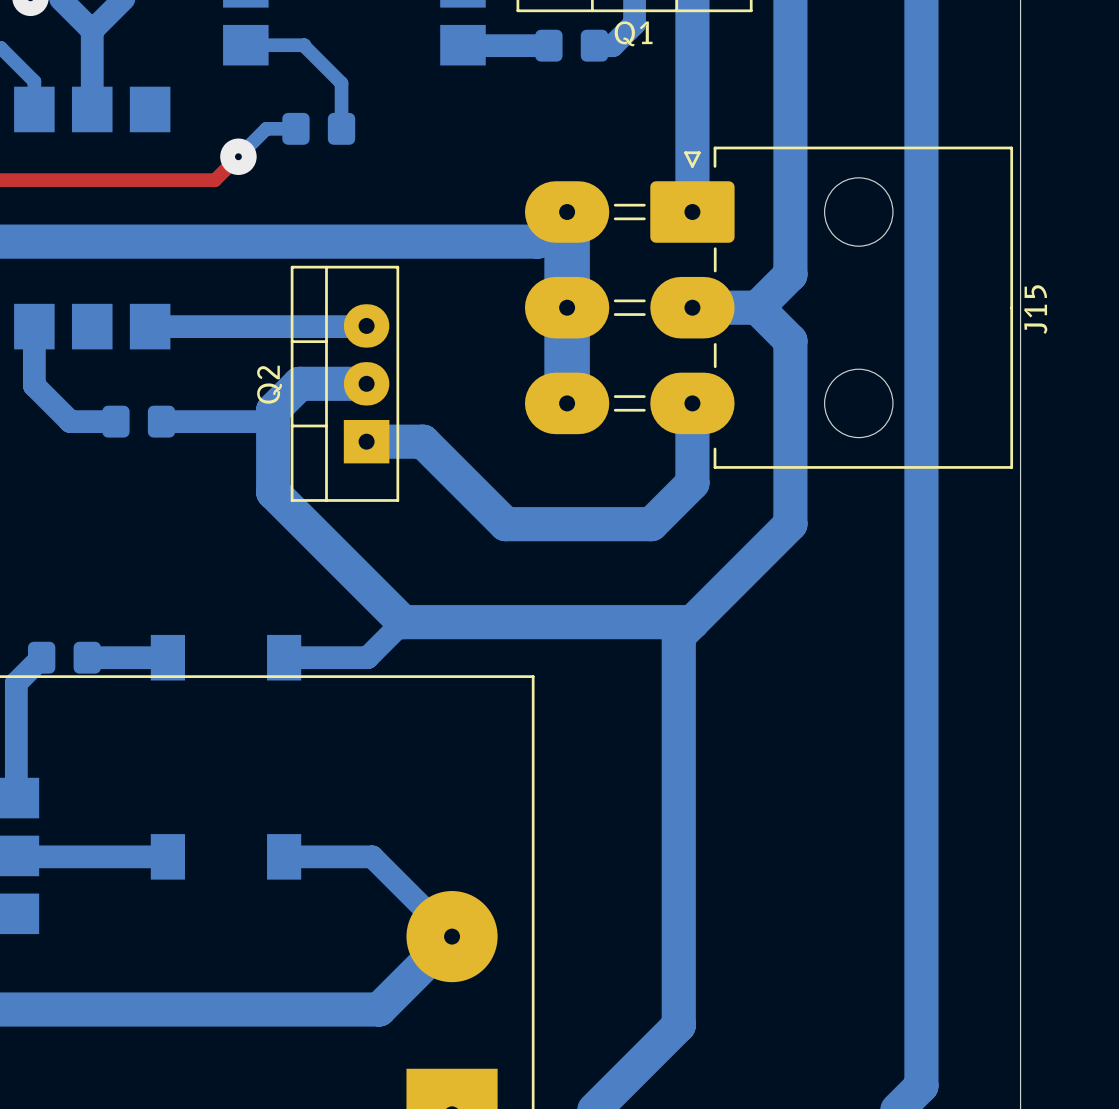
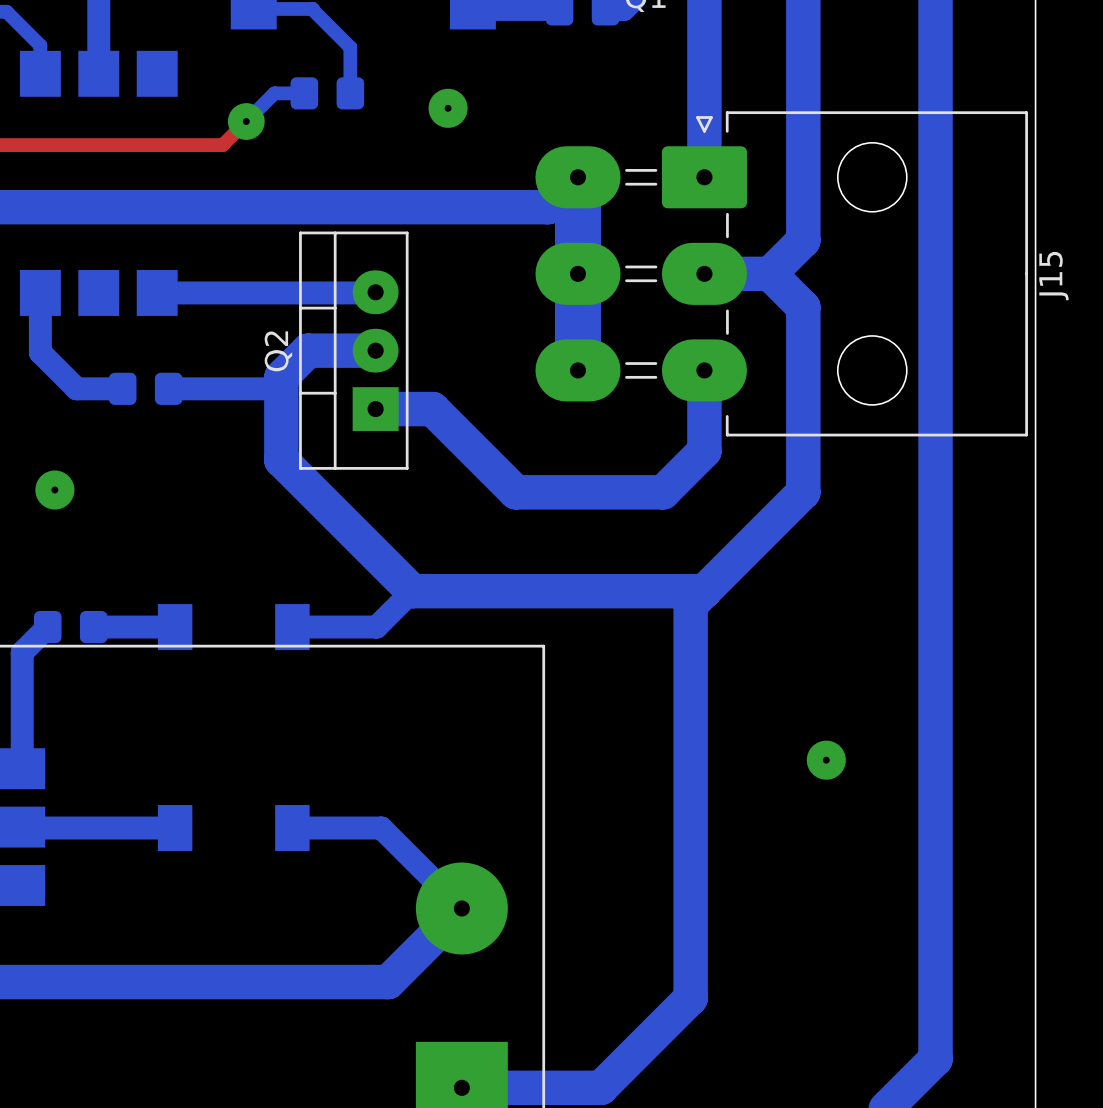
via: none -> (448, 108)
via: none -> (54, 490)
via: none -> (826, 760)

